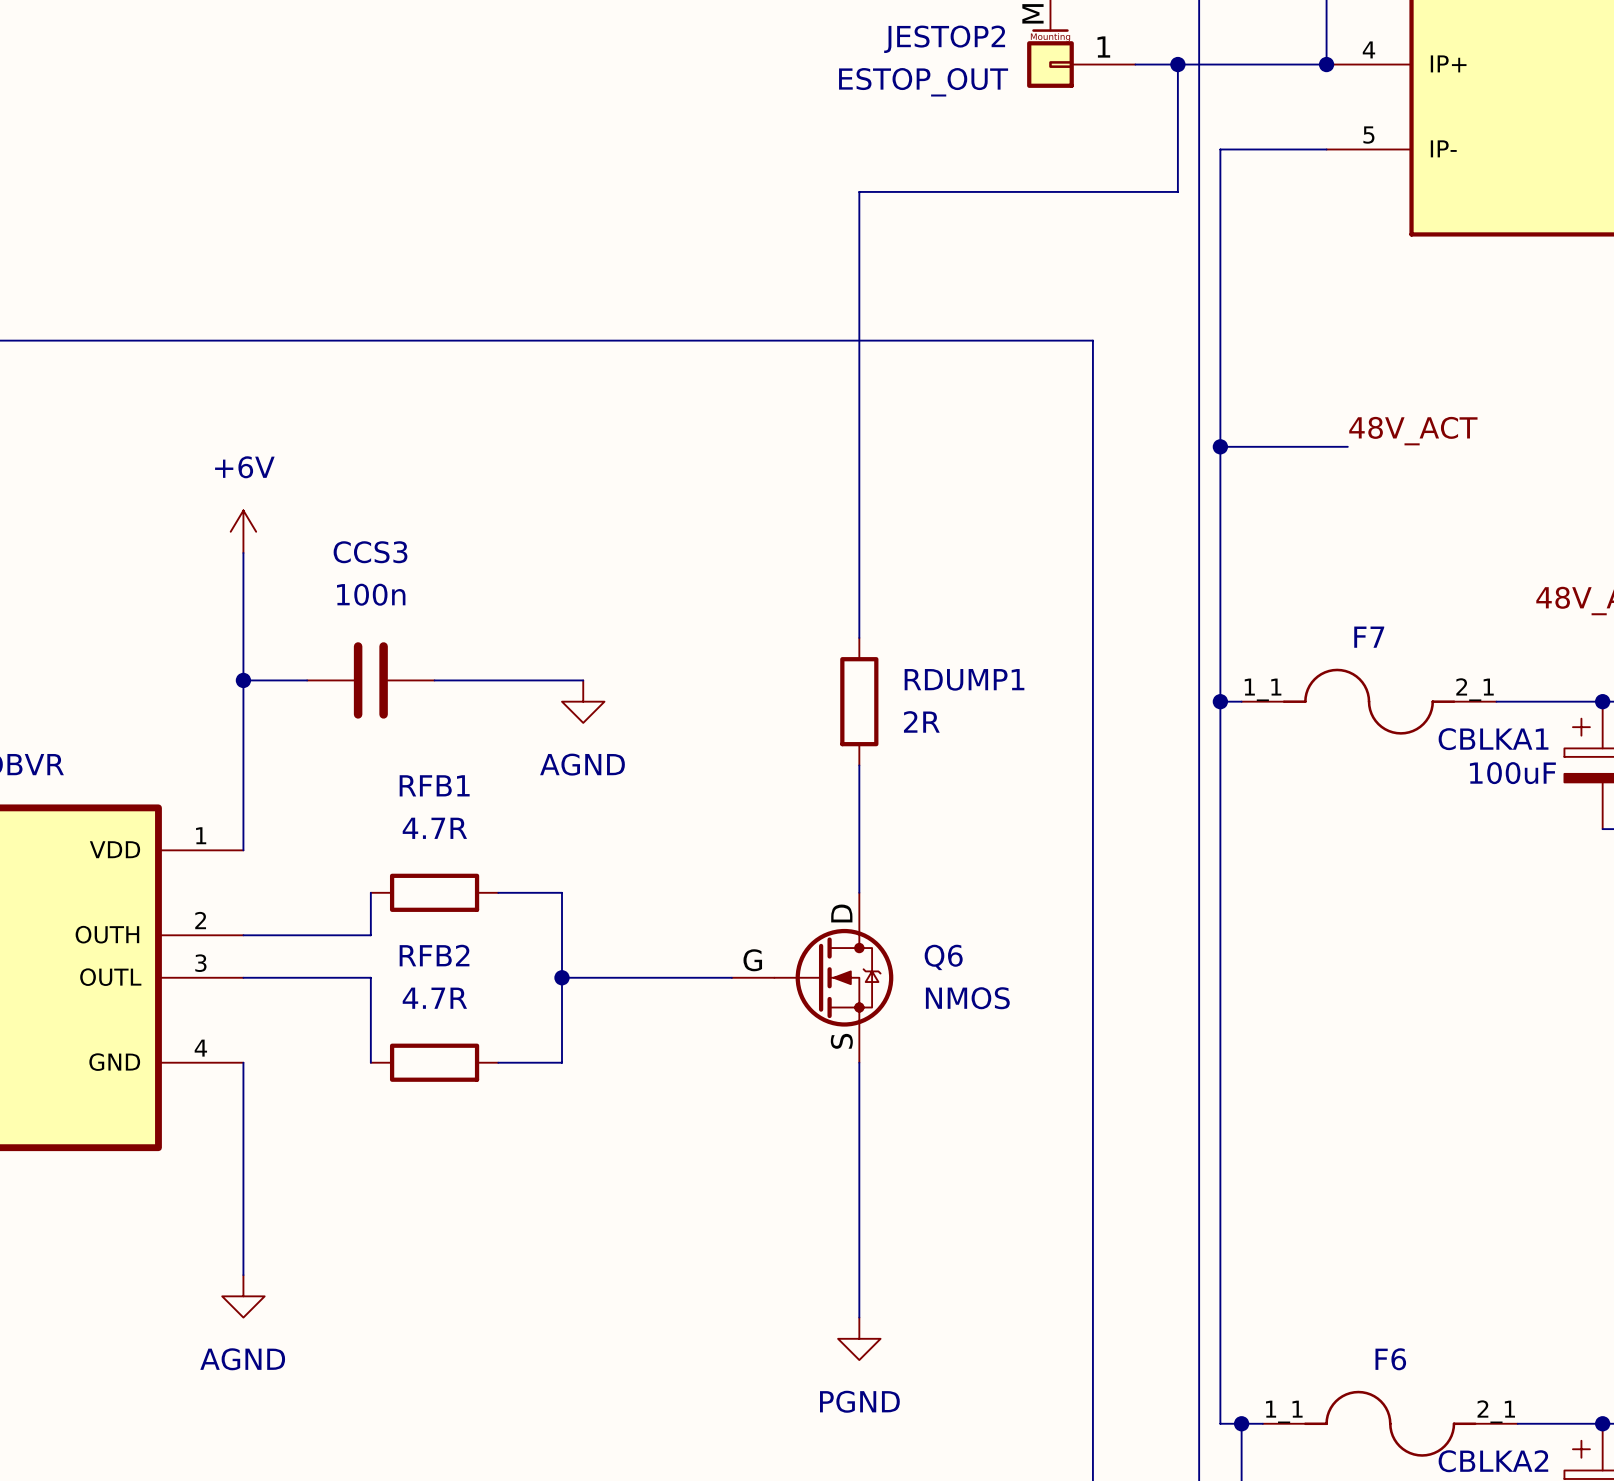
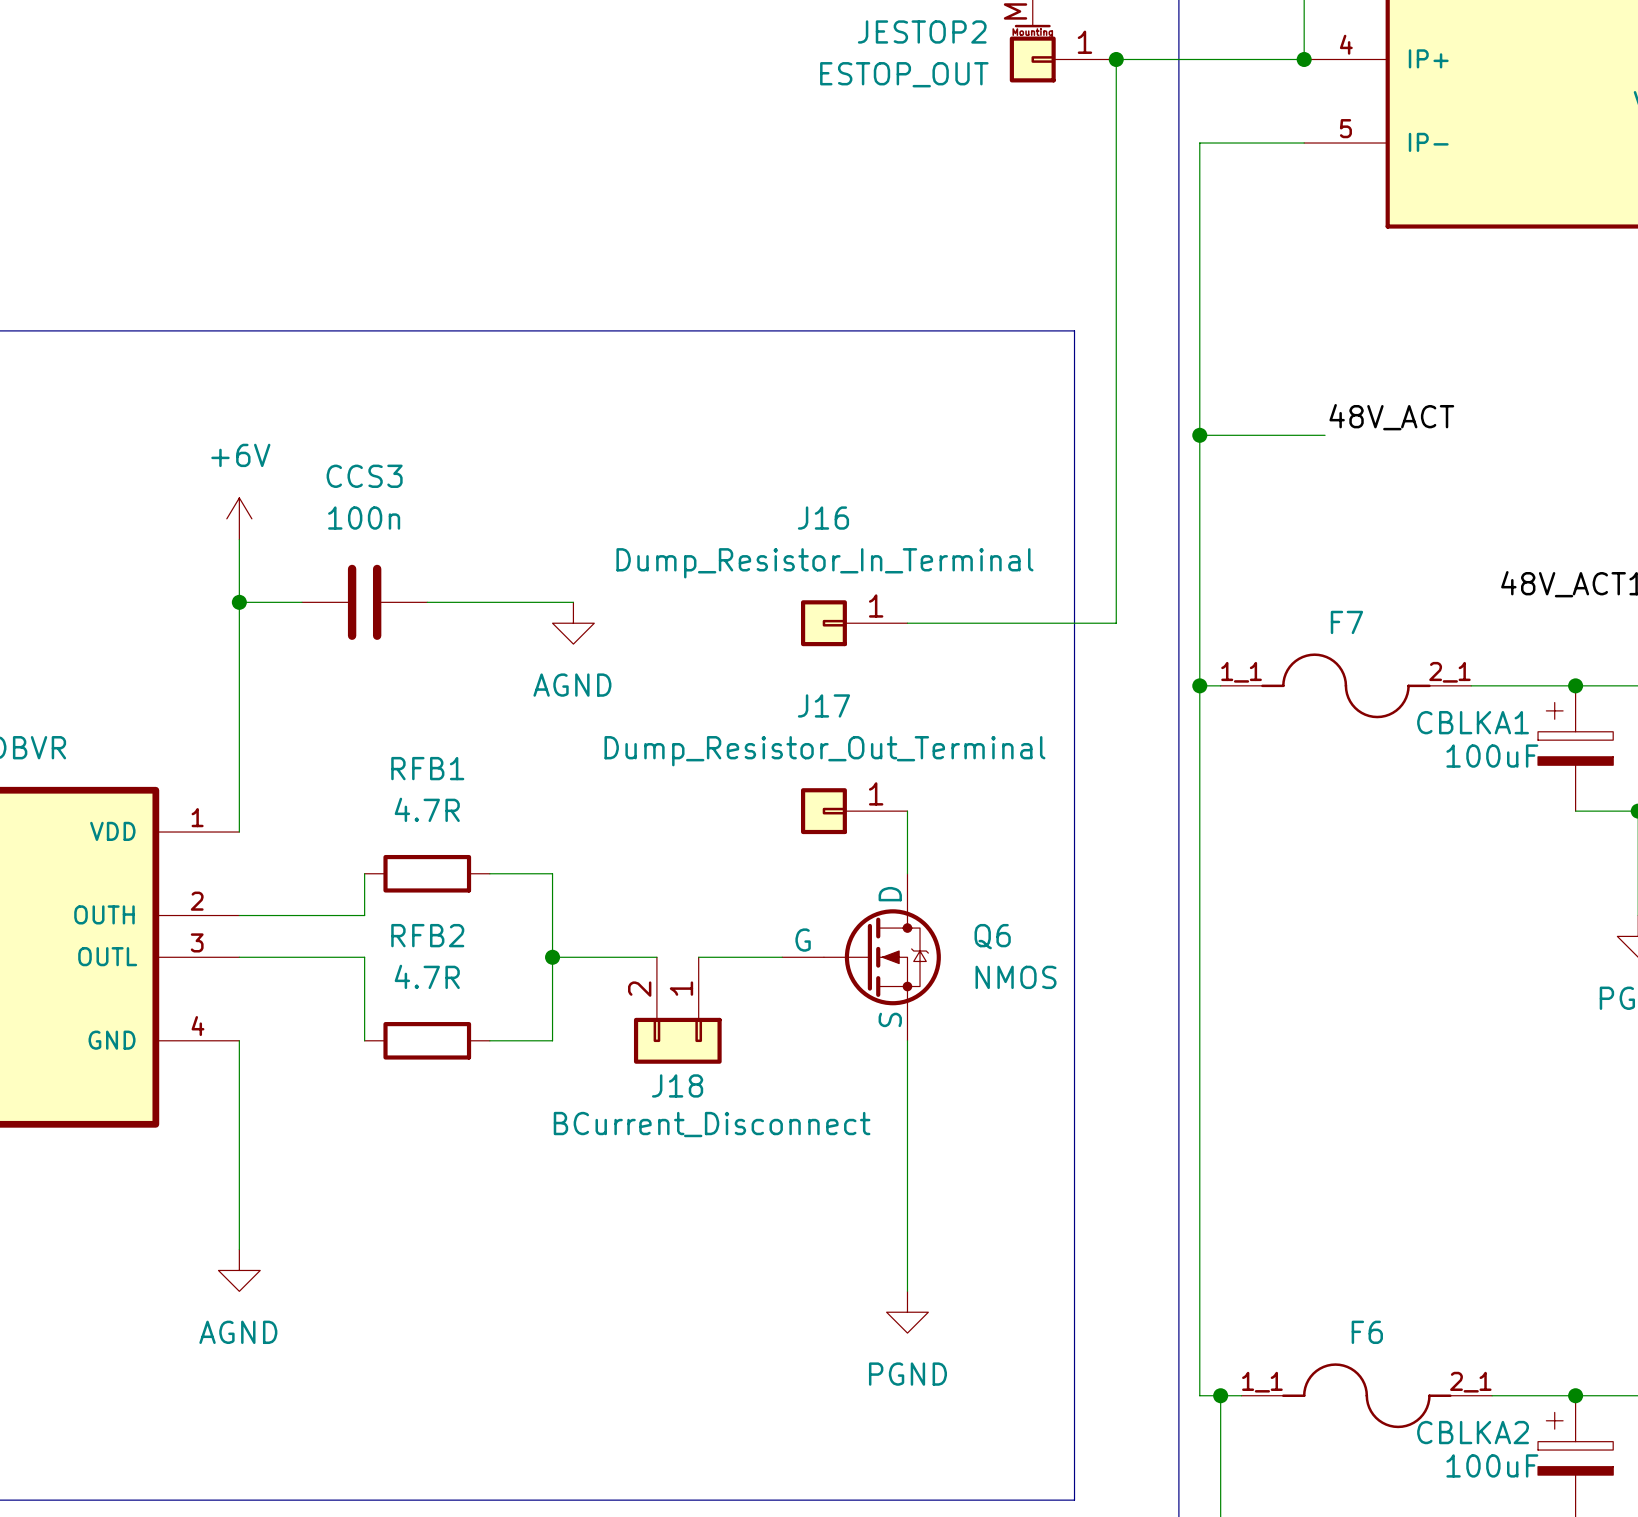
wire: none -> (1116, 59) (1116, 623) (907, 623)
wire: (1177, 64) (1177, 191) (859, 191) (859, 637) -> none
junction position: (1177, 64) -> (1116, 59)
J16: none -> Dump_Resistor_In_Terminal (854, 623)
wire: (243, 680) (307, 680) -> (239, 602) (301, 602)
junction position: (243, 680) -> (239, 602)
CCS3 position: (370, 680) -> (364, 602)
wire: (434, 680) (583, 680) -> (427, 602) (573, 602)
power symbol position: AGND (583, 701) -> AGND (573, 623)
RDUMP1: 2R (859, 701) -> none
wire: (859, 765) (859, 892) -> none
J17: none -> Dump_Resistor_Out_Terminal (854, 811)
wire: none -> (907, 811) (907, 873)
wire: (668, 977) (710, 977) -> none
Q6 position: (812, 977) -> (861, 957)
J18: none -> BCurrent_Disconnect (677, 1010)
wire: (859, 1062) (859, 1317) -> (907, 1040) (907, 1291)
power symbol position: PGND (859, 1338) -> PGND (907, 1312)

